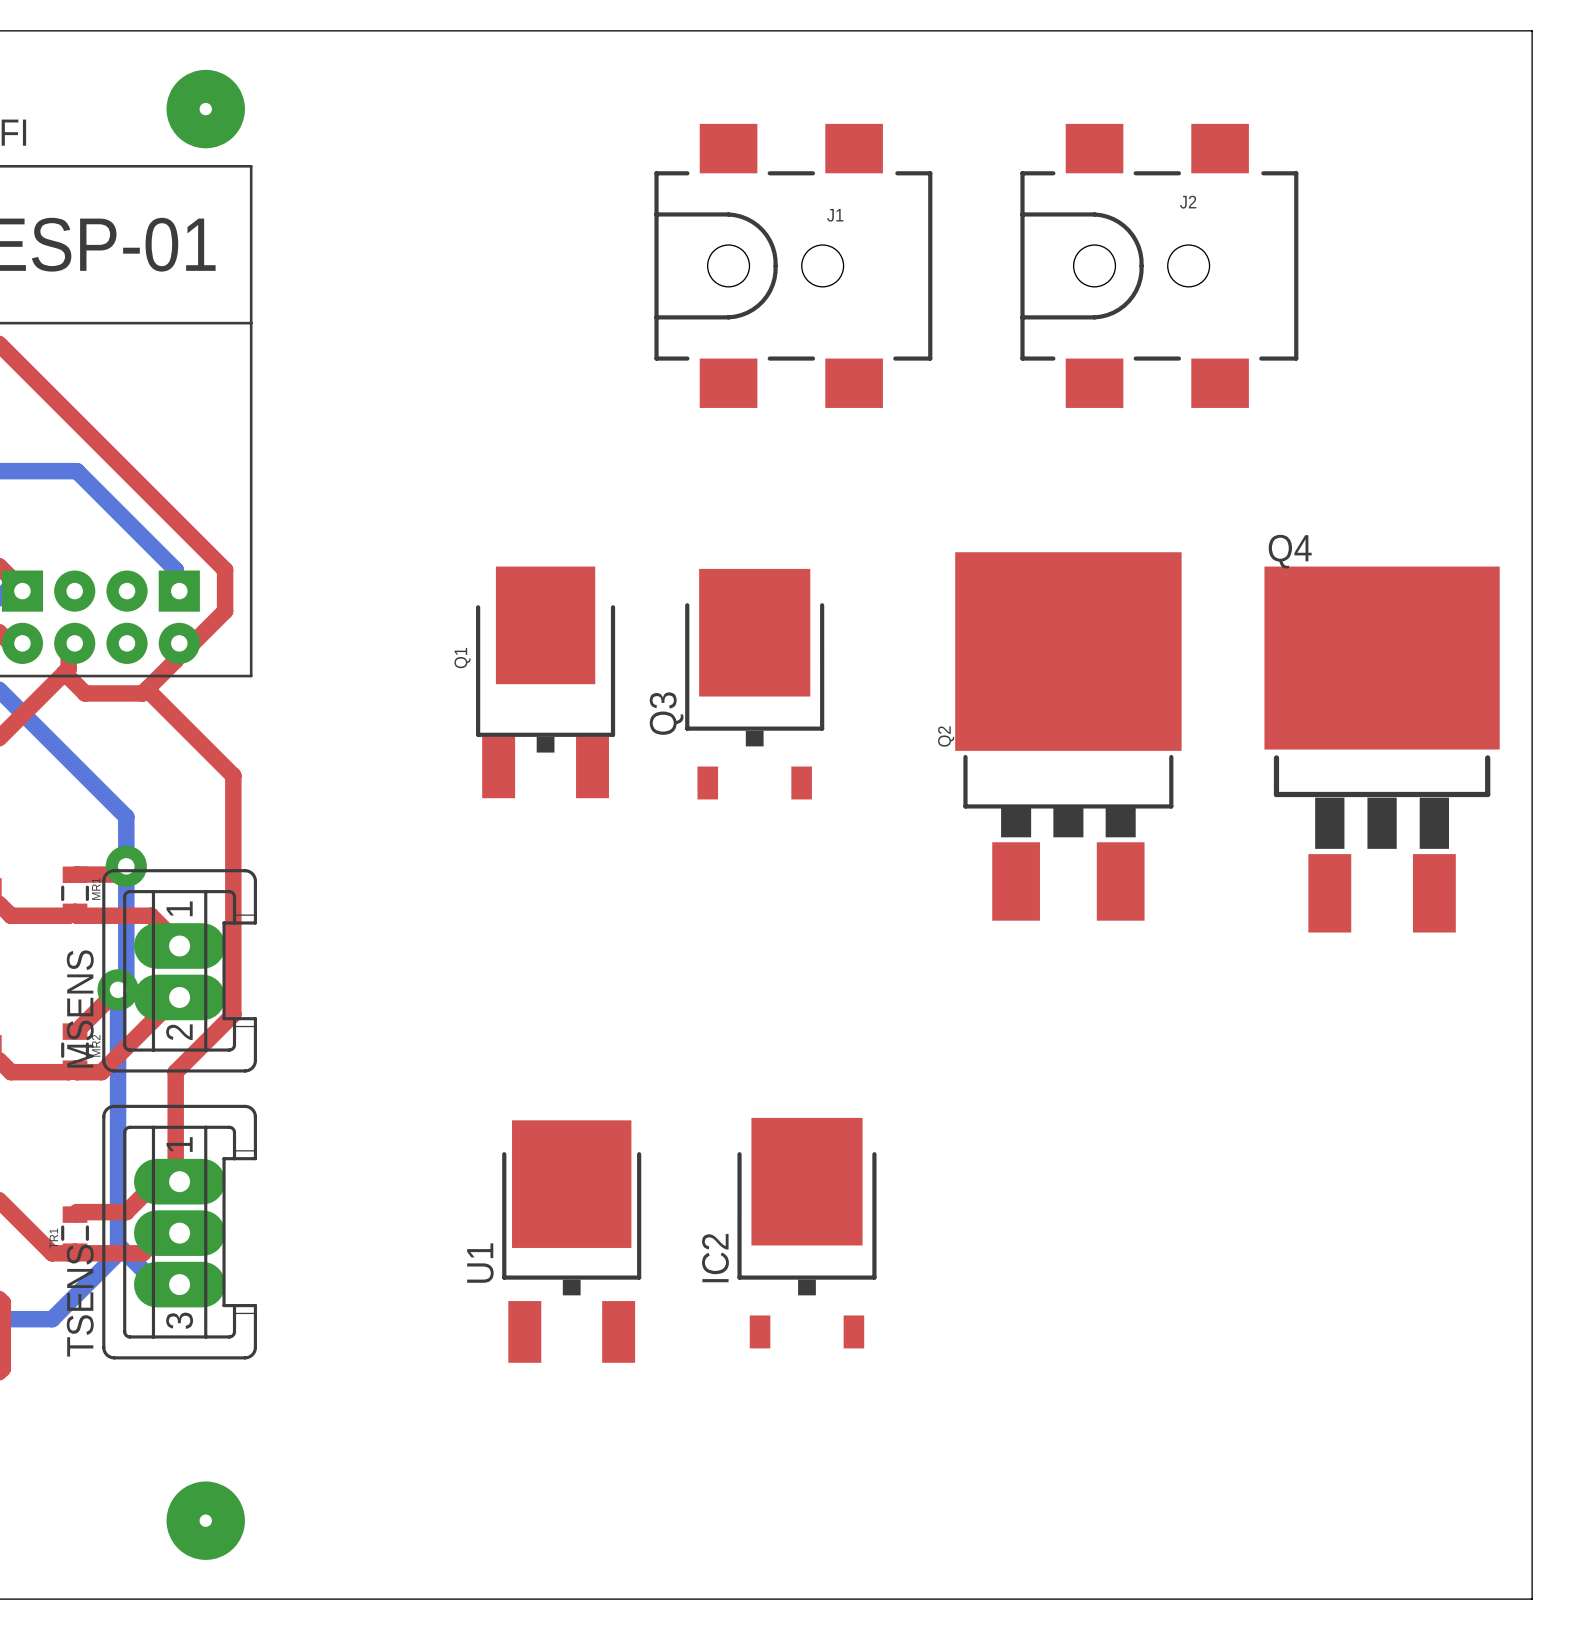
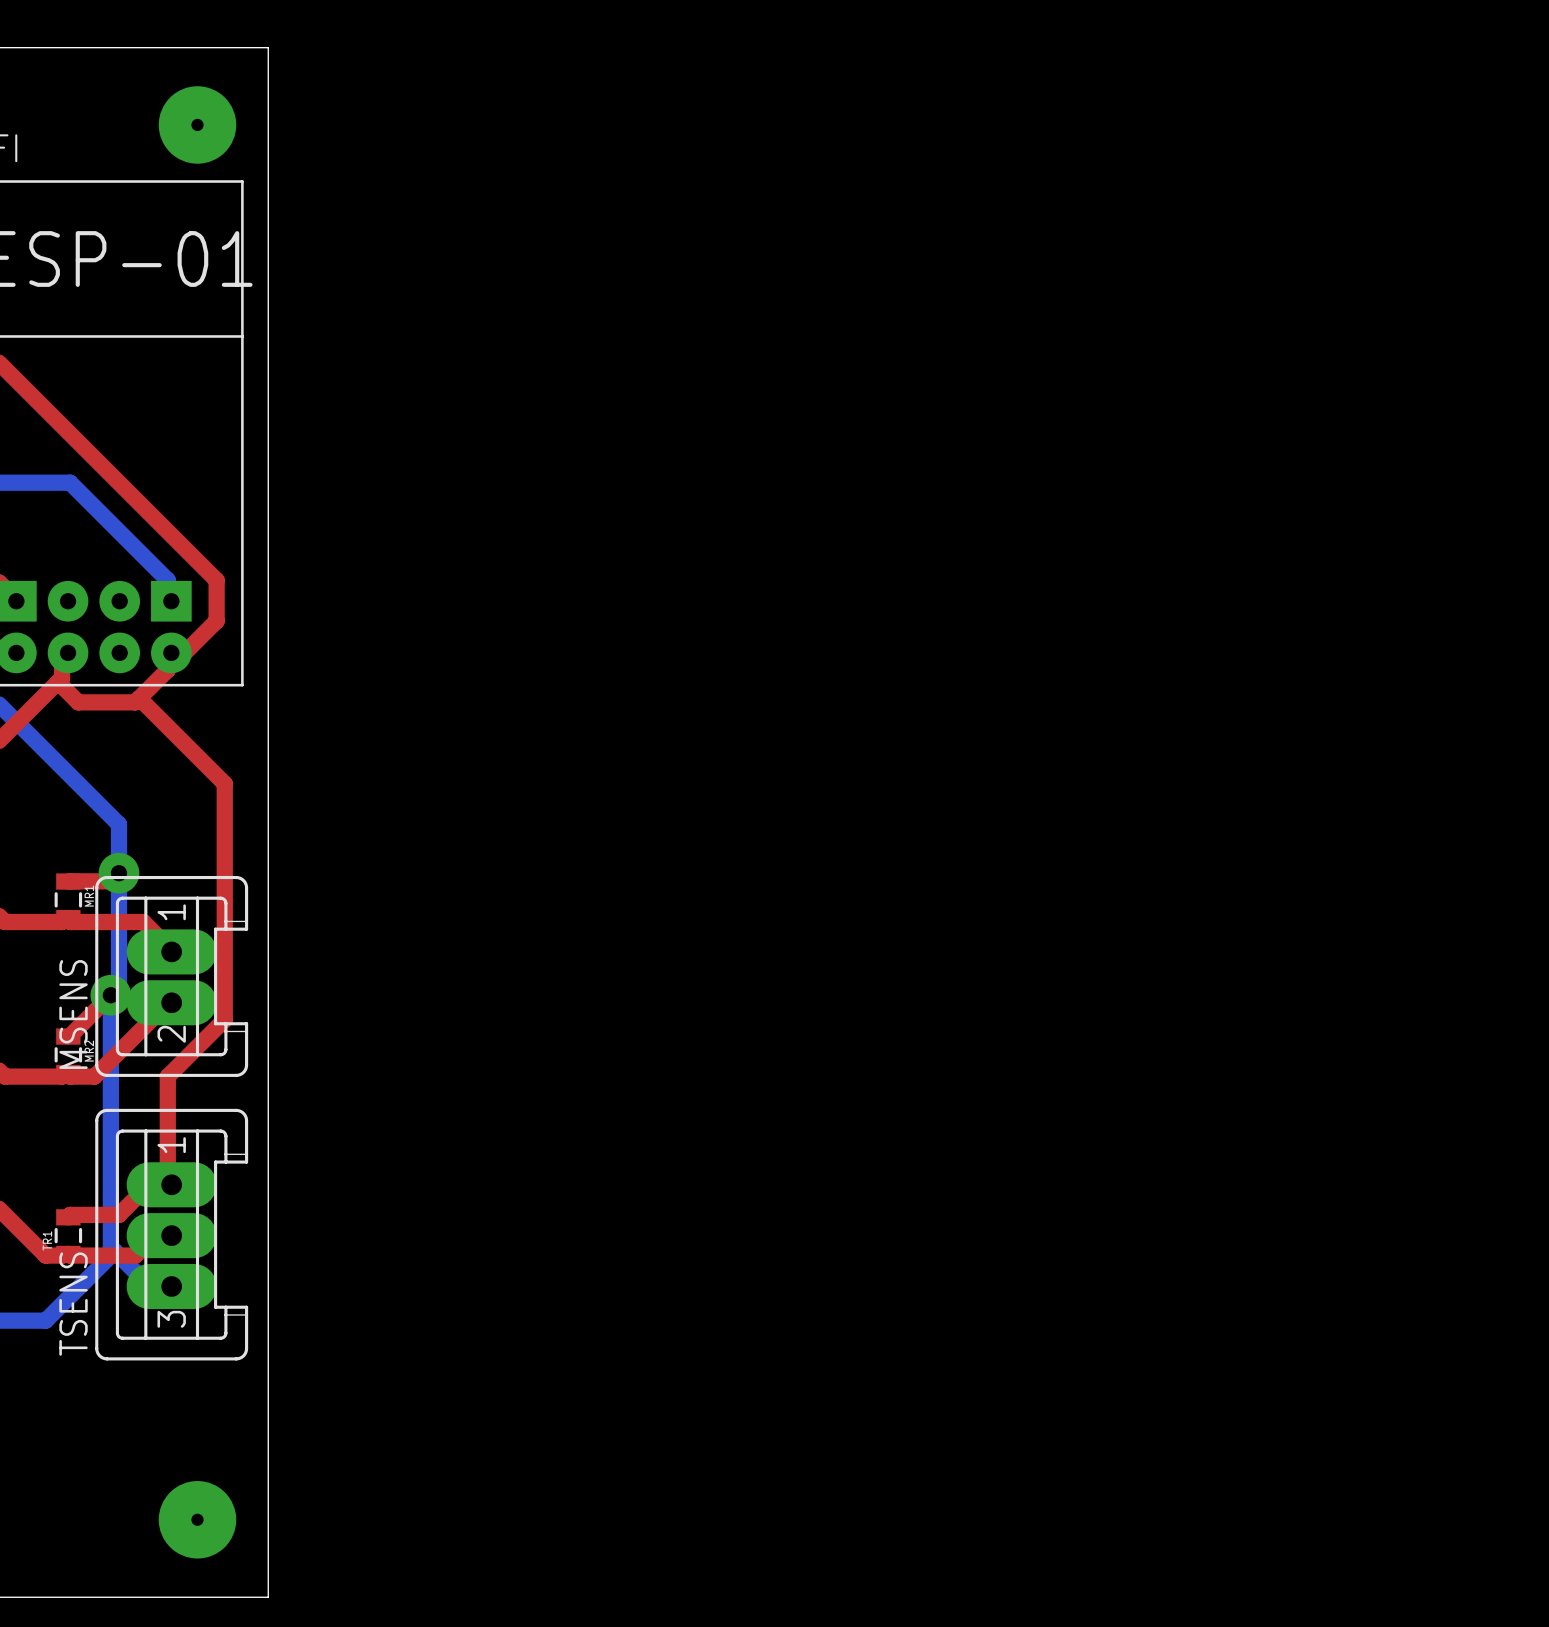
board edge: (277, 30) (1532, 30) (1532, 1599) (277, 1599) -> (268, 47) (268, 1597)
J1: (793, 265) -> none
J2: (1159, 265) -> none
Q1: (545, 682) -> none
Q3: (754, 684) -> none
Q2: (1068, 736) -> none
Q4: (1382, 749) -> none
IC2: (806, 1233) -> none
U1: (571, 1241) -> none

